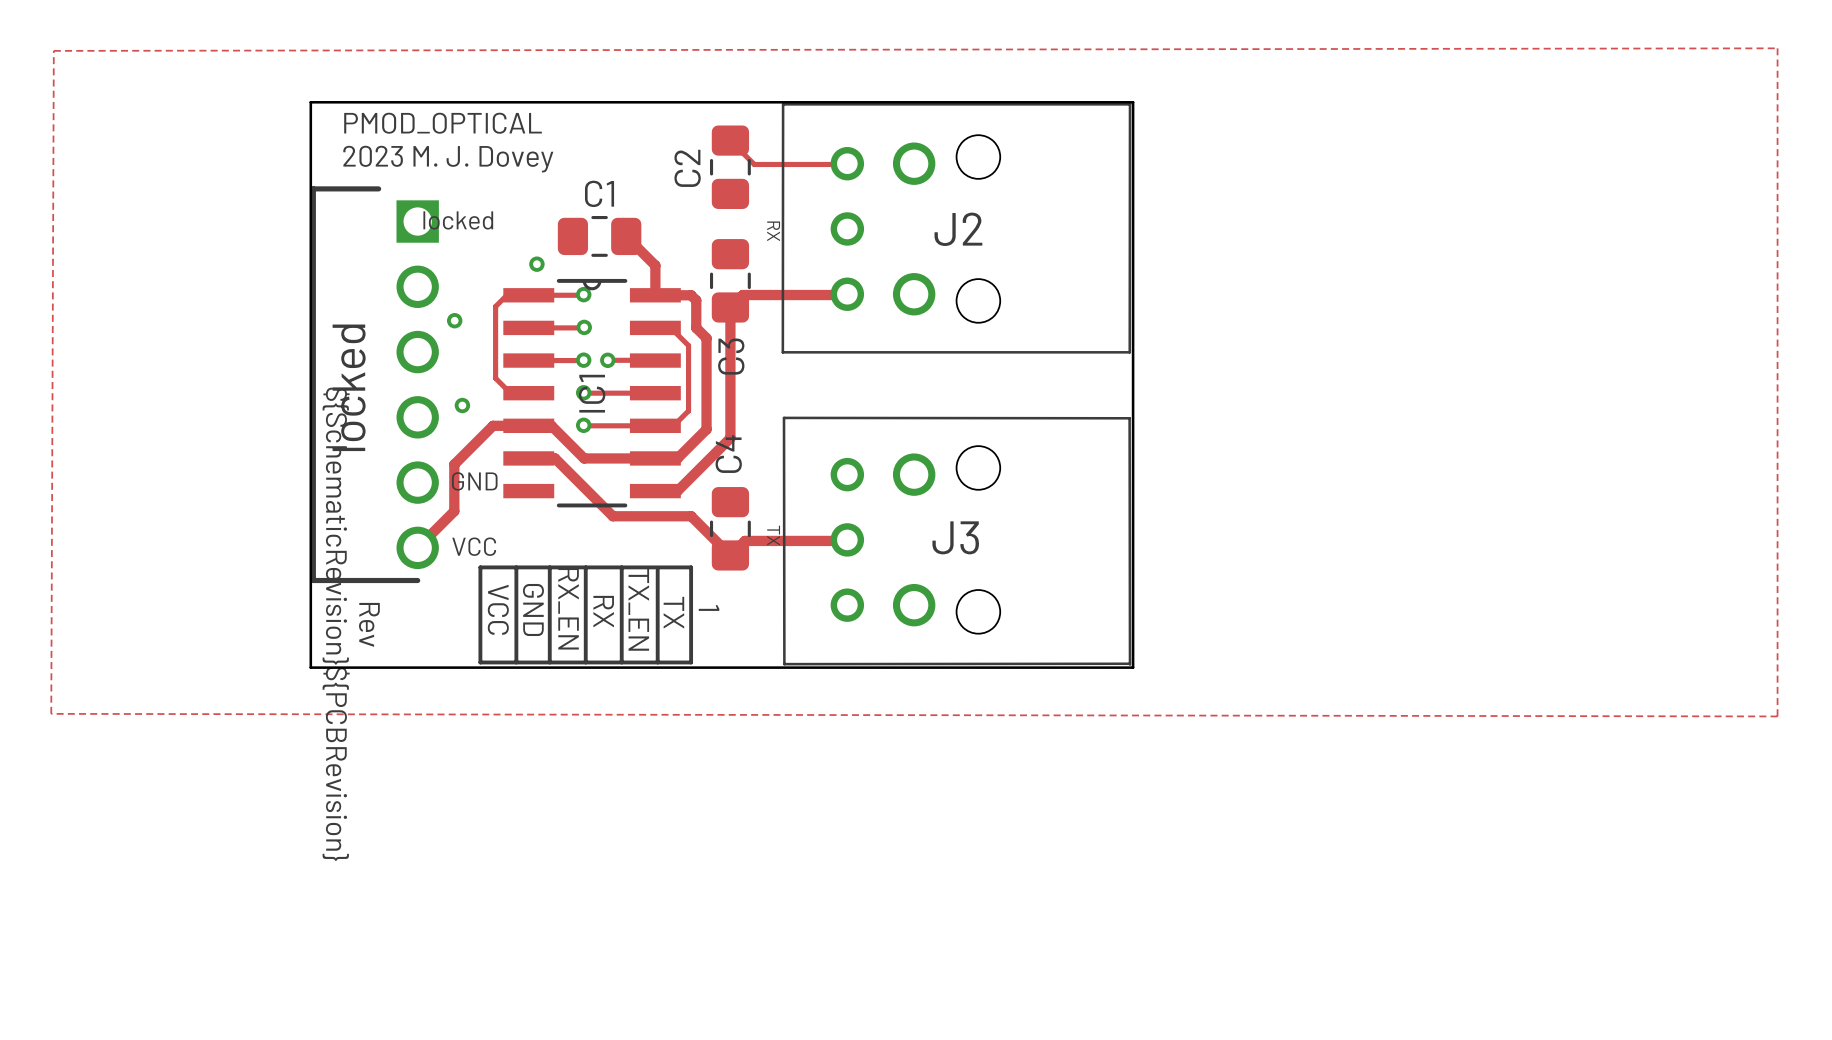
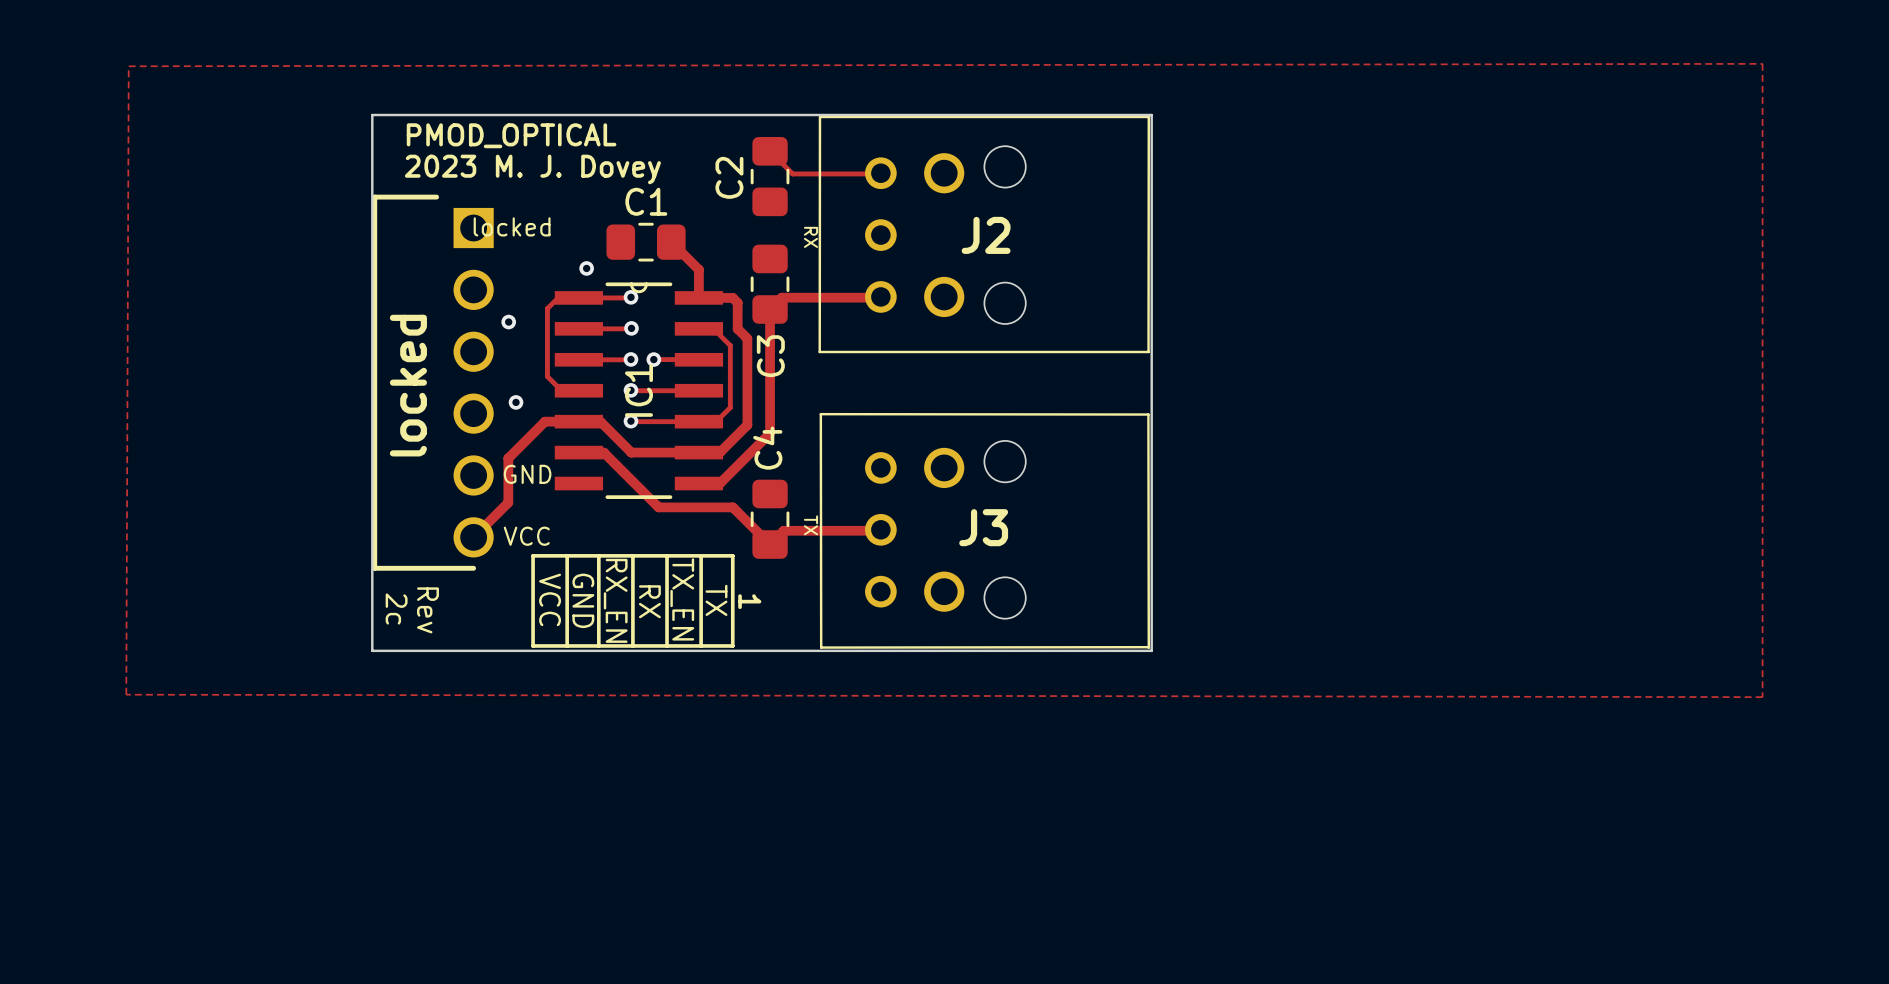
text: ${SchematicRevision}${PCBRevision} (336, 624) -> 2c (396, 608)

